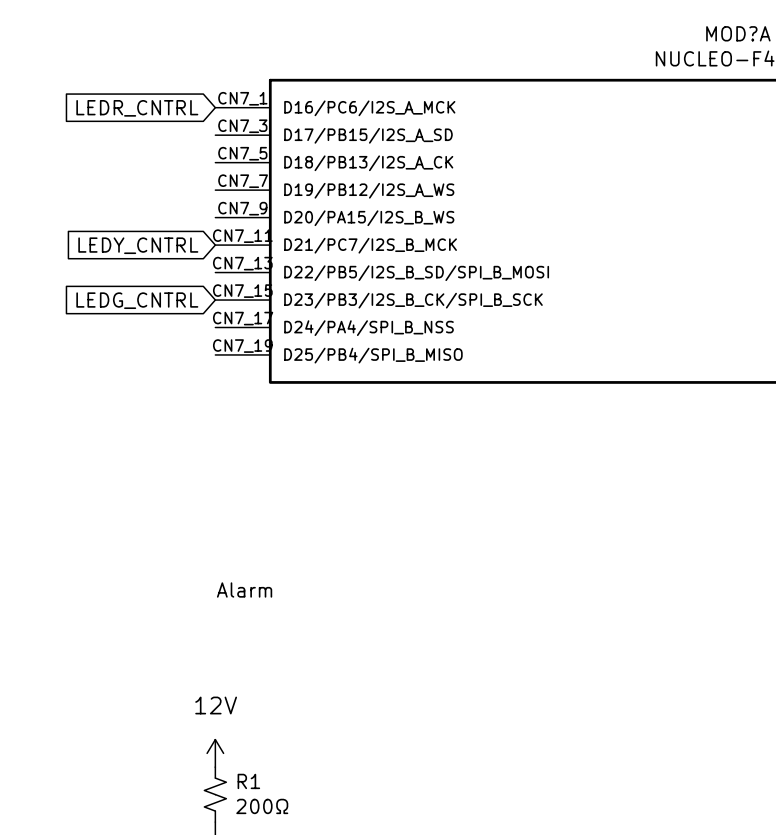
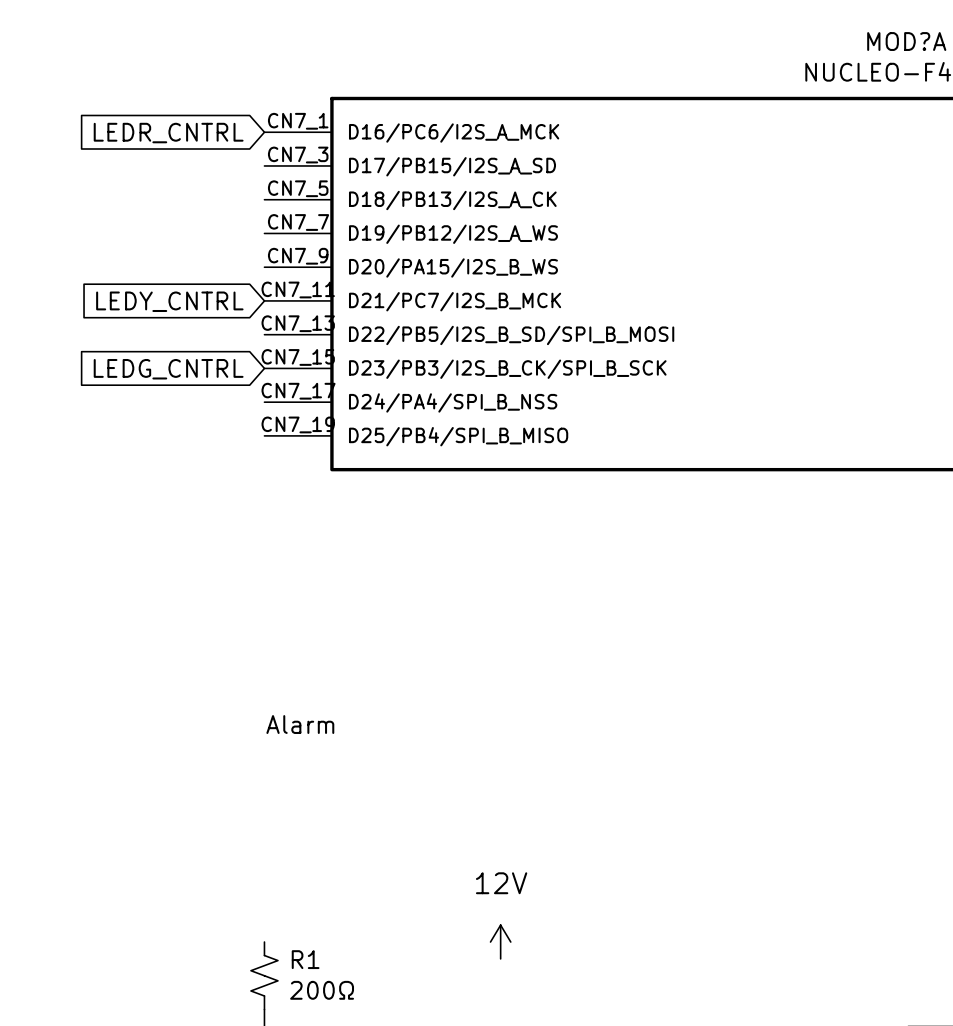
power symbol position: 12V (215, 753) -> 12V (500, 942)

